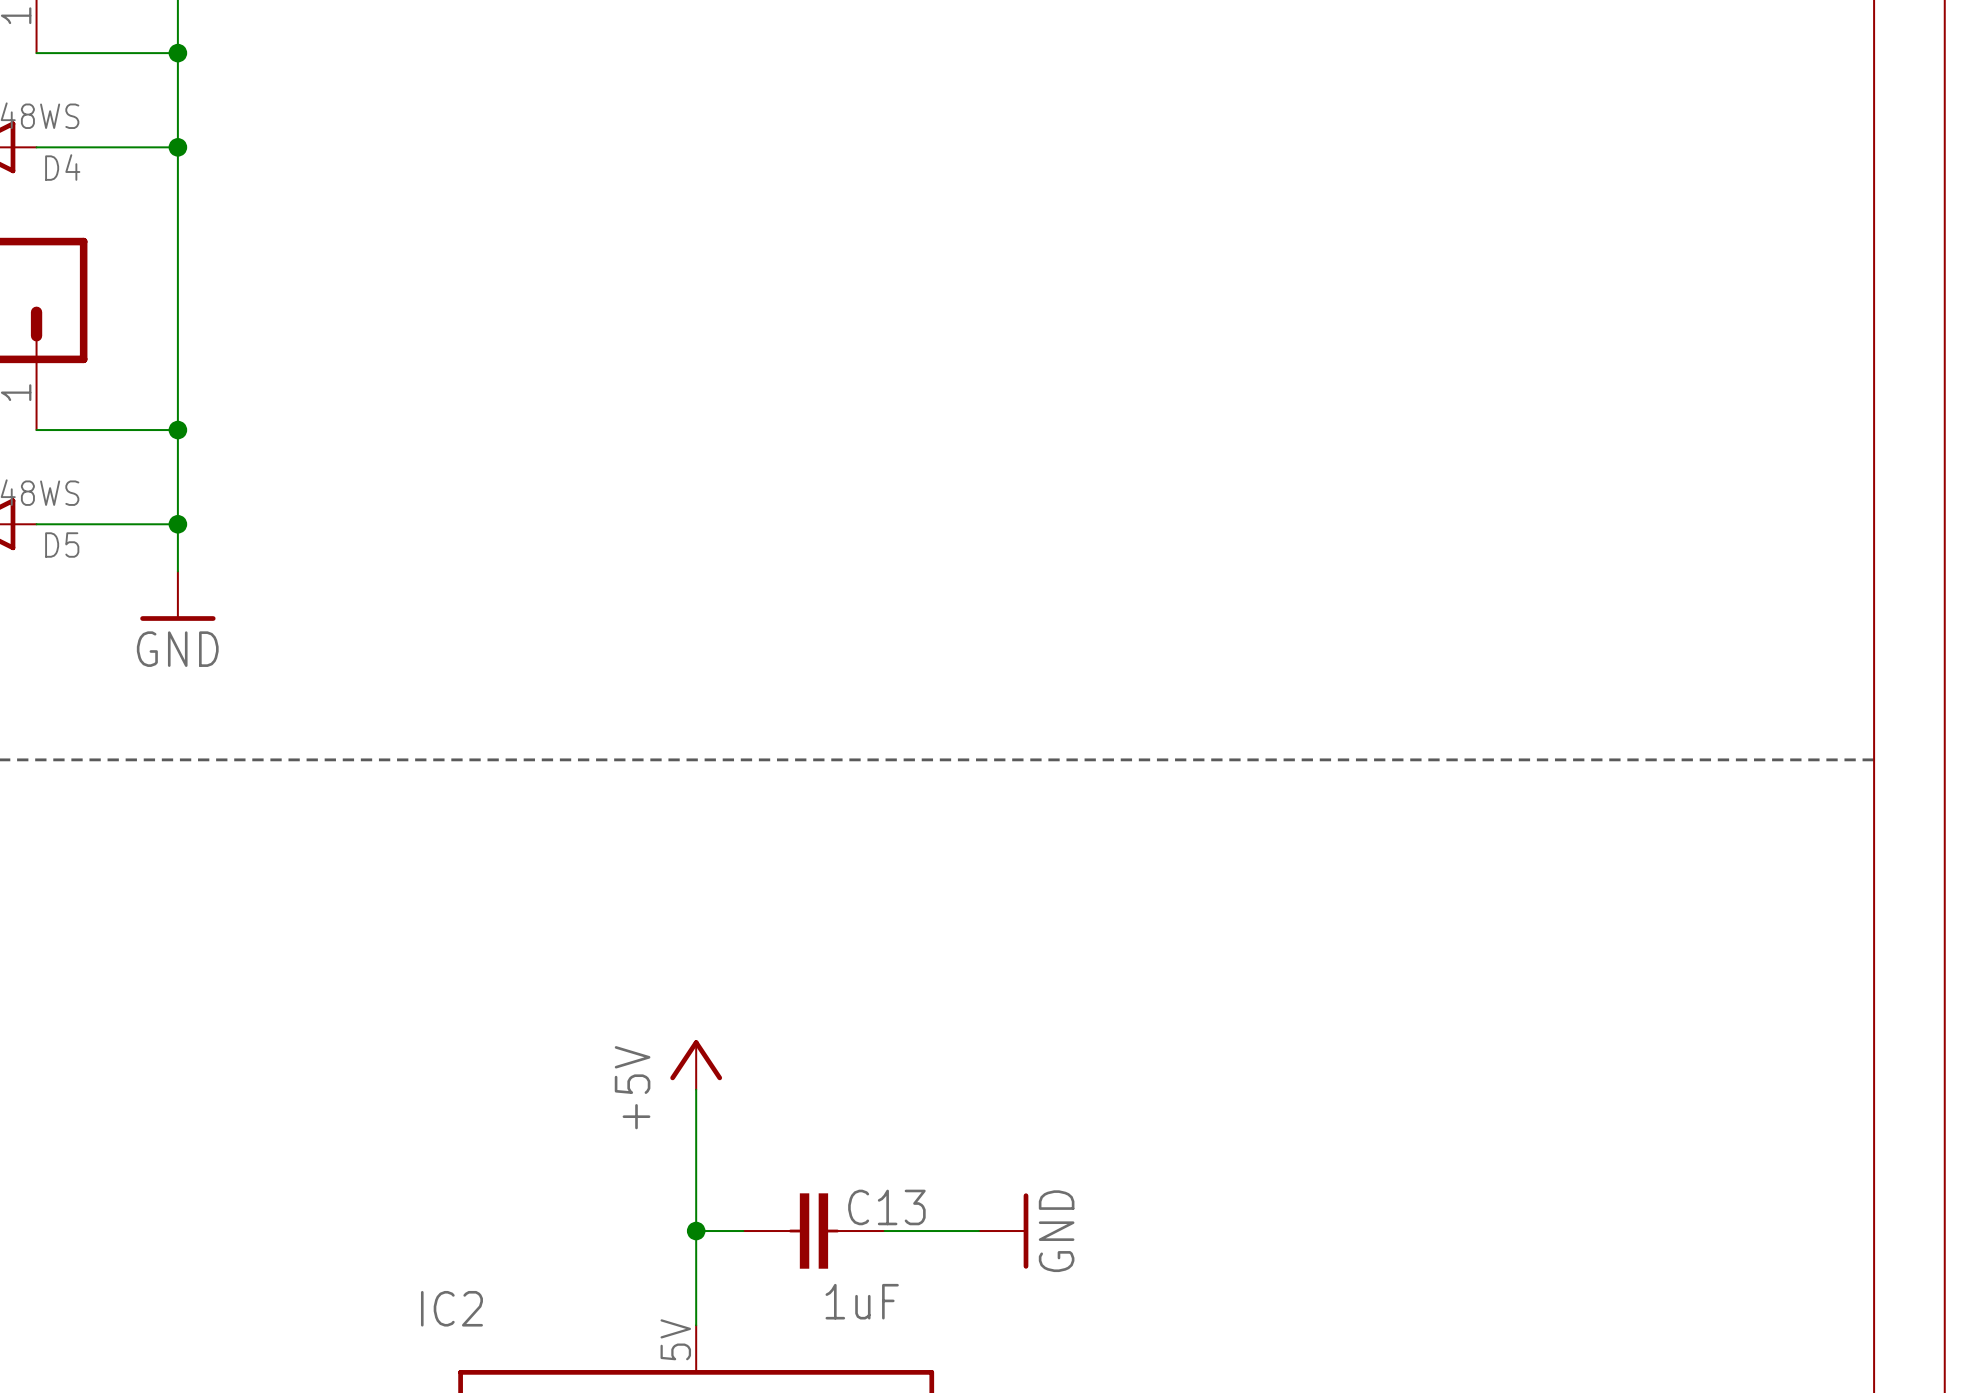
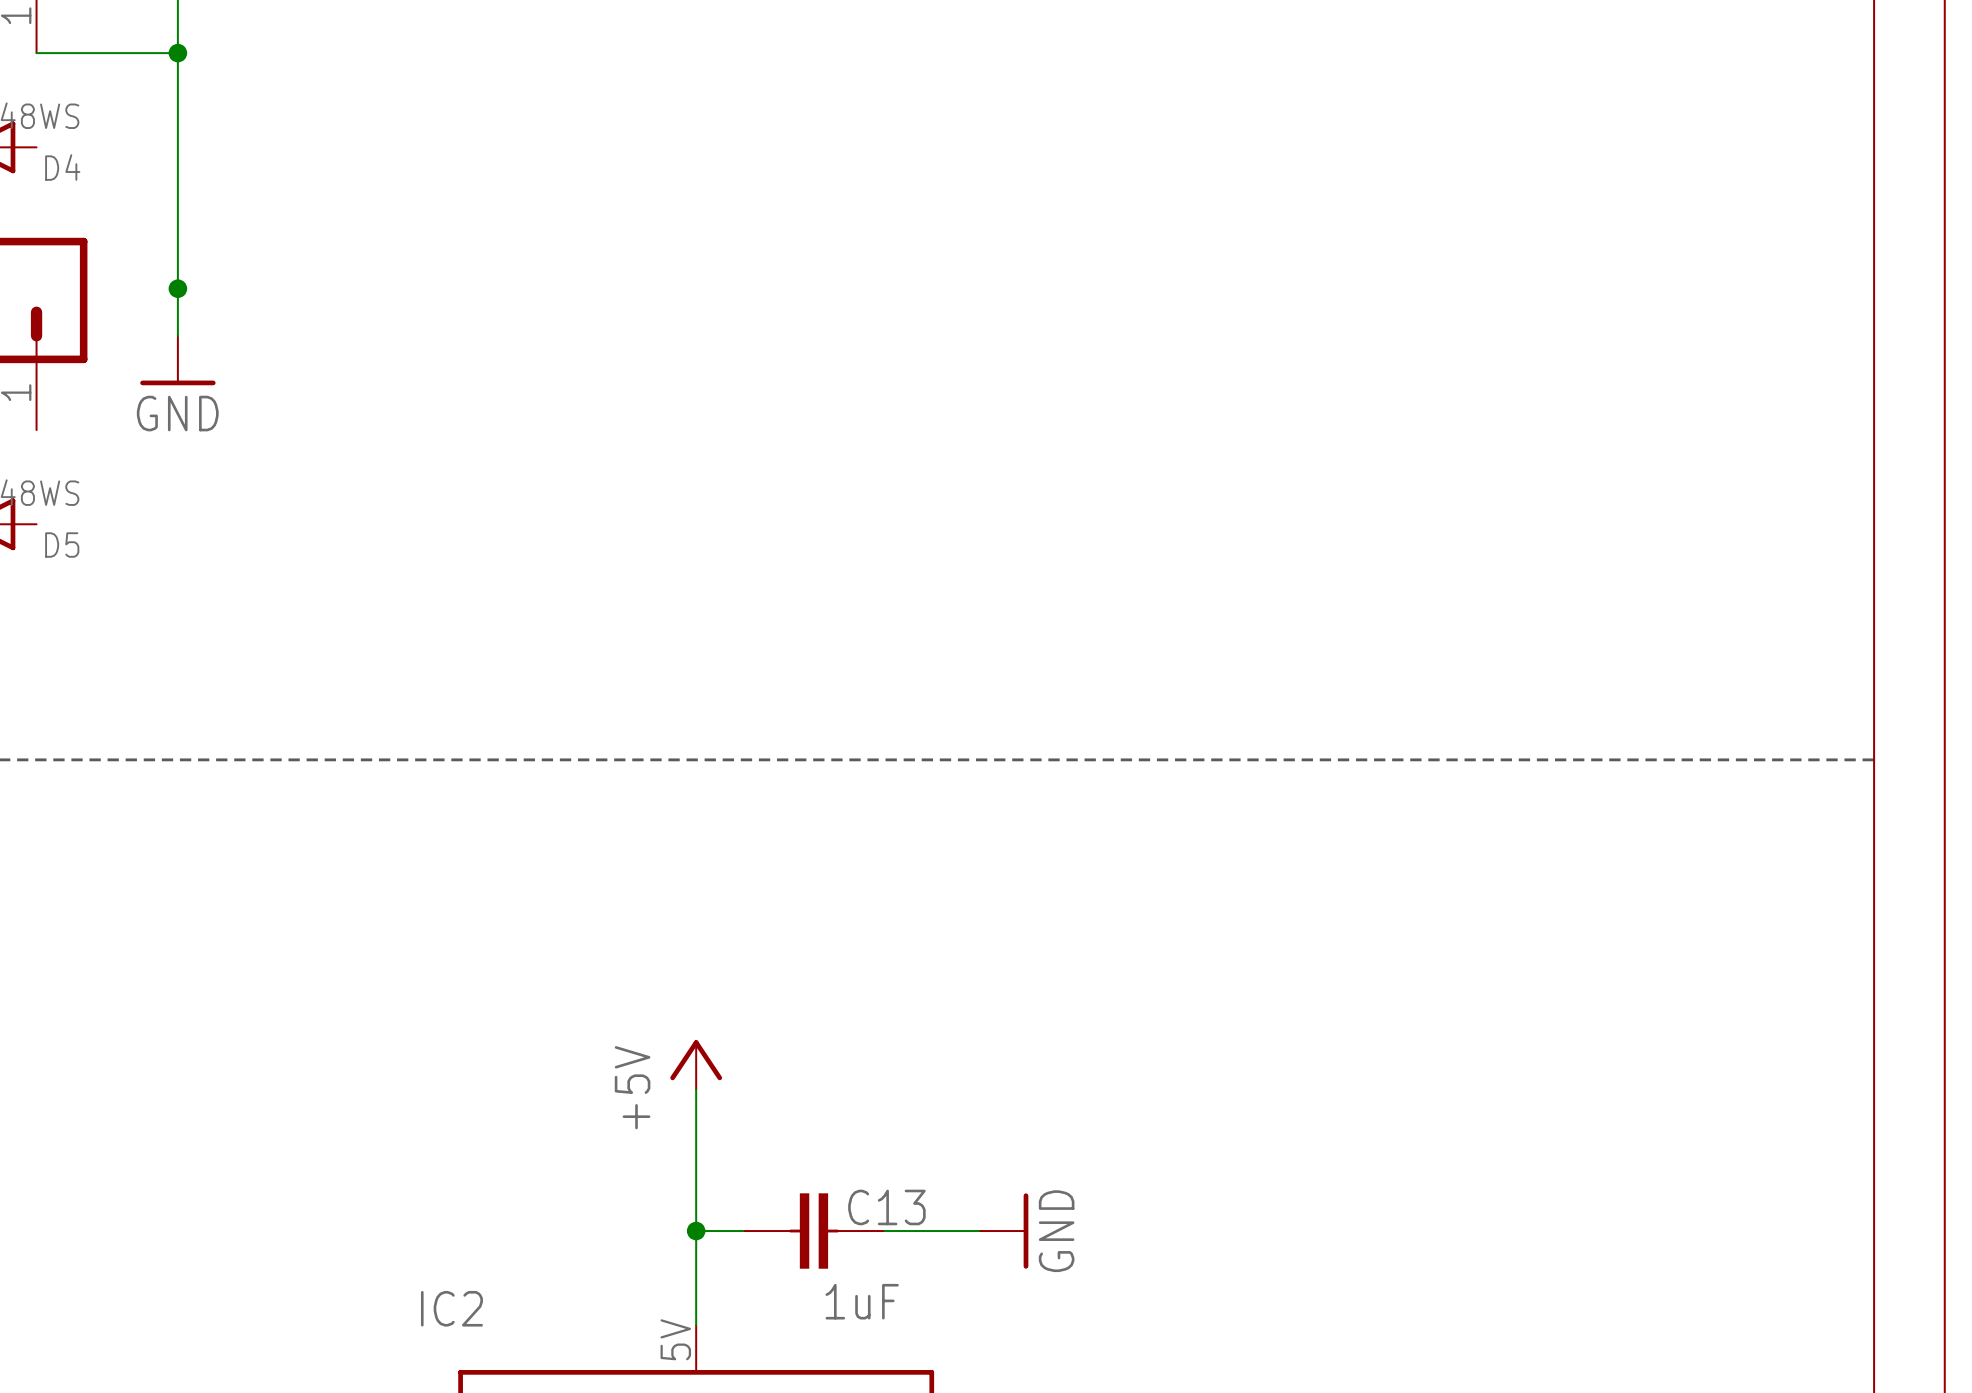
wire: (36, 147) (177, 147) -> none
junction: (177, 147) -> none
junction: none -> (177, 288)
wire: (177, 335) (177, 571) -> none
wire: (36, 430) (177, 430) -> none
junction: (177, 430) -> none
wire: (36, 524) (177, 524) -> none
junction: (177, 524) -> none
power symbol position: GND (177, 596) -> GND (177, 360)

